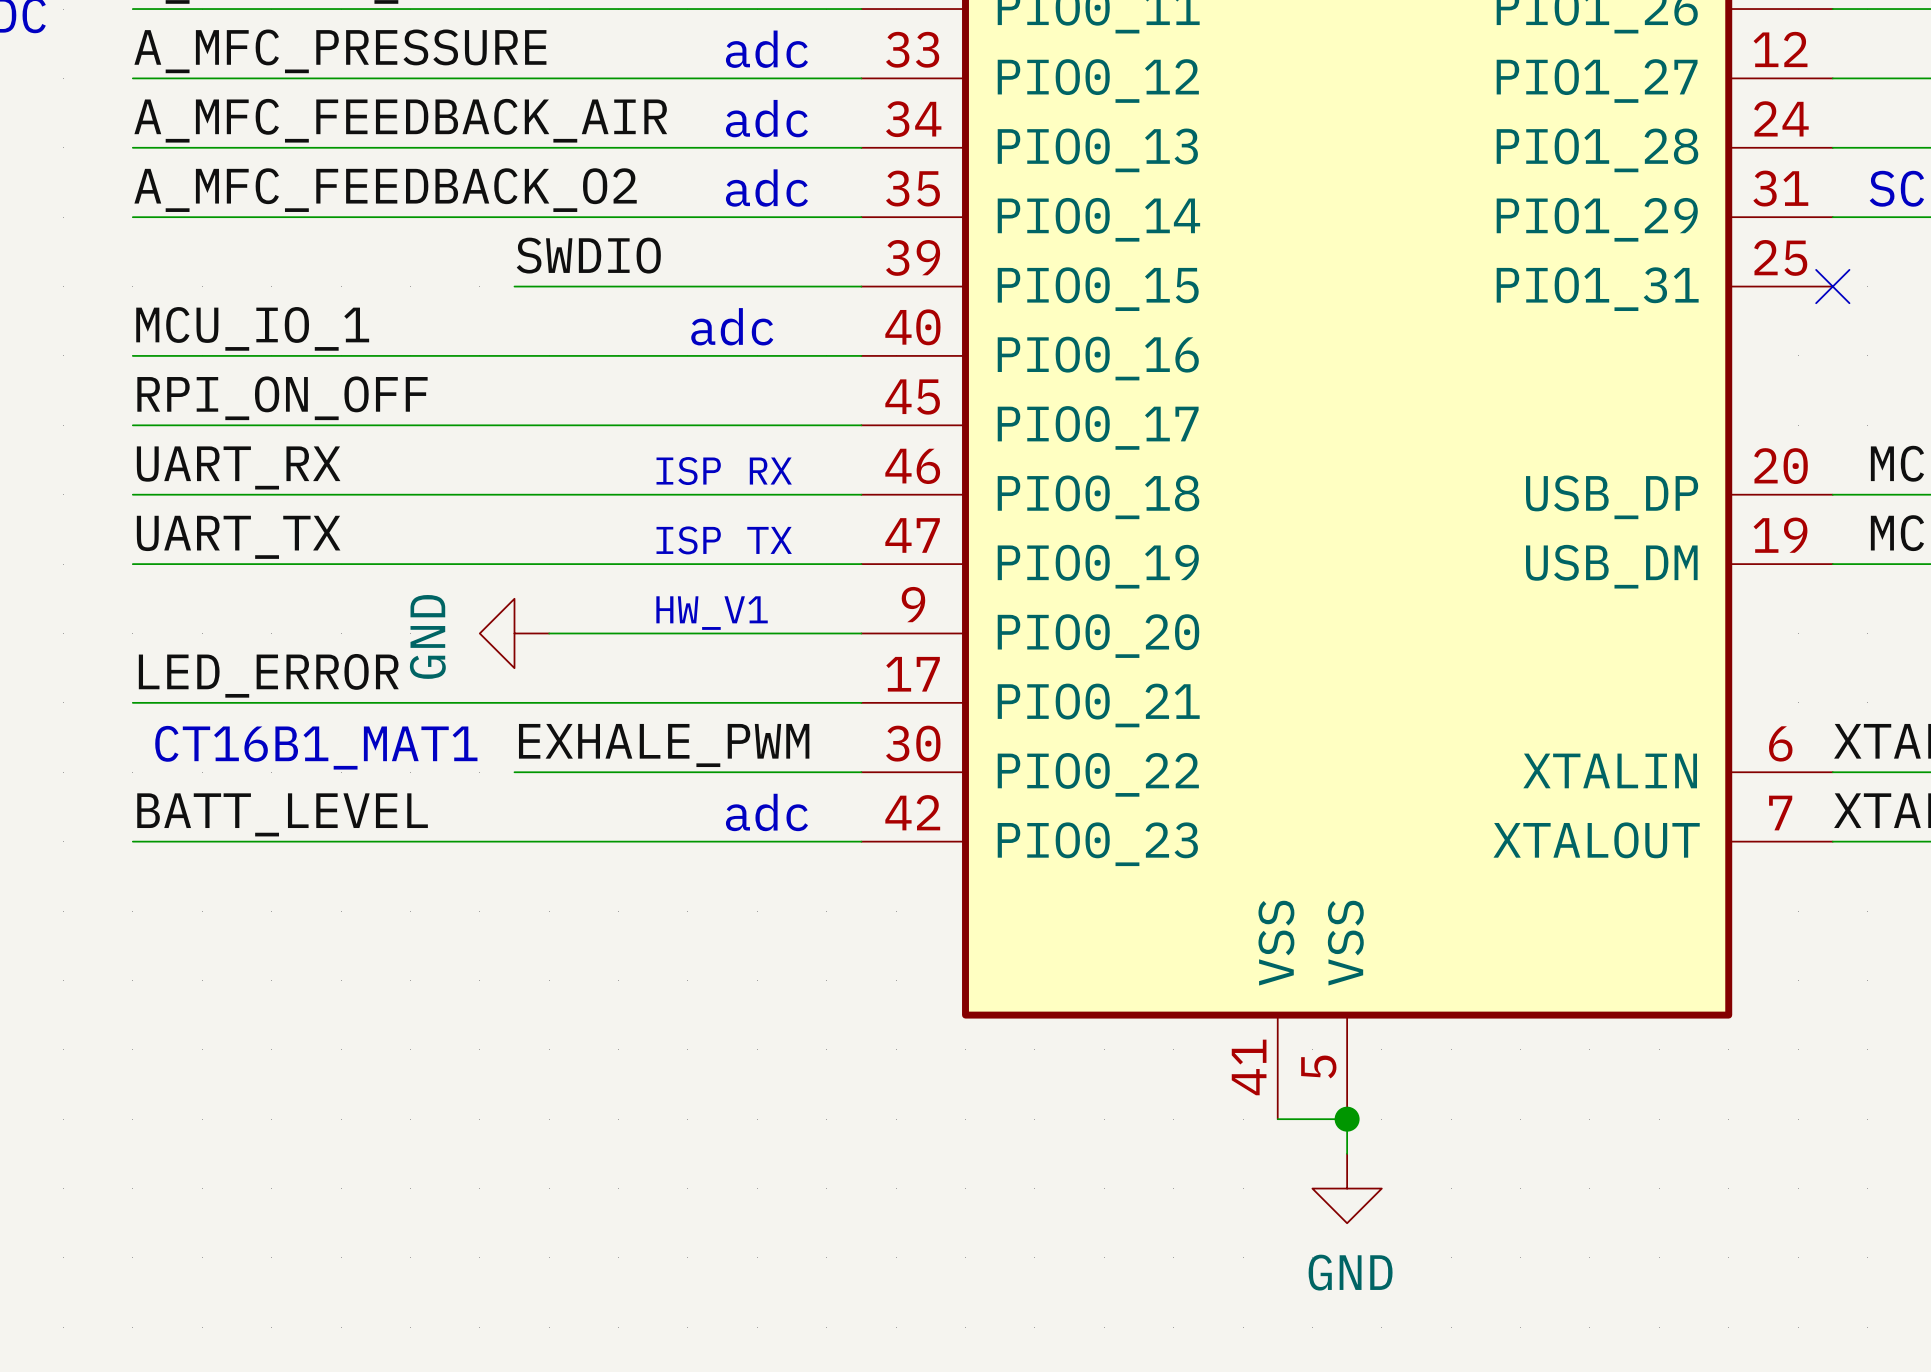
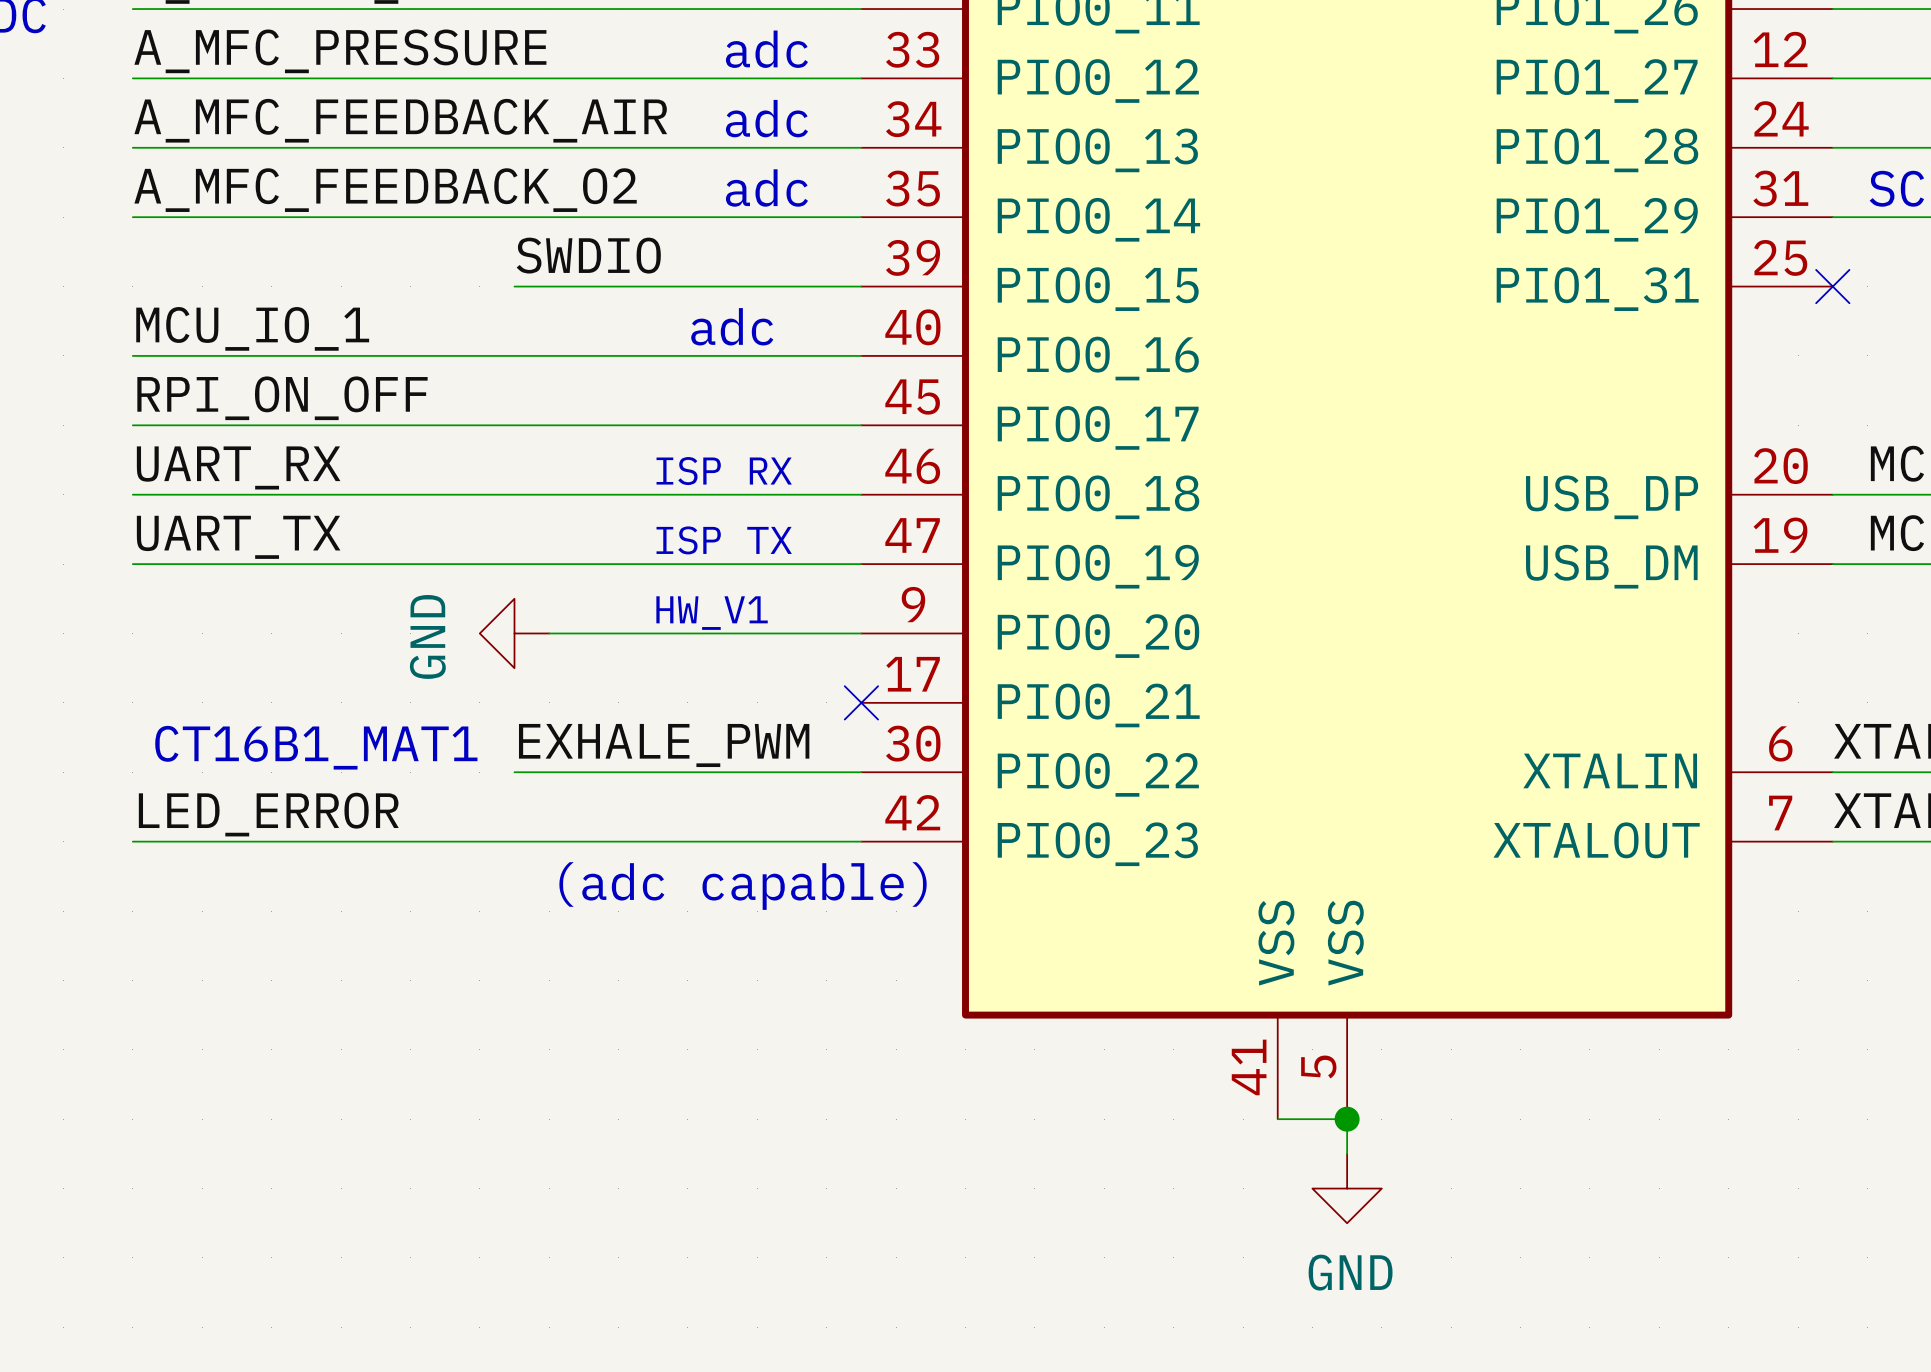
label: LED_ERROR (268, 675) -> none
wire: (132, 702) (861, 702) -> none
no-connect mark: none -> (861, 702)
text: adc (766, 812) -> none
label: BATT_LEVEL (282, 814) -> LED_ERROR (268, 814)
text: none -> (adc capable) (743, 886)

